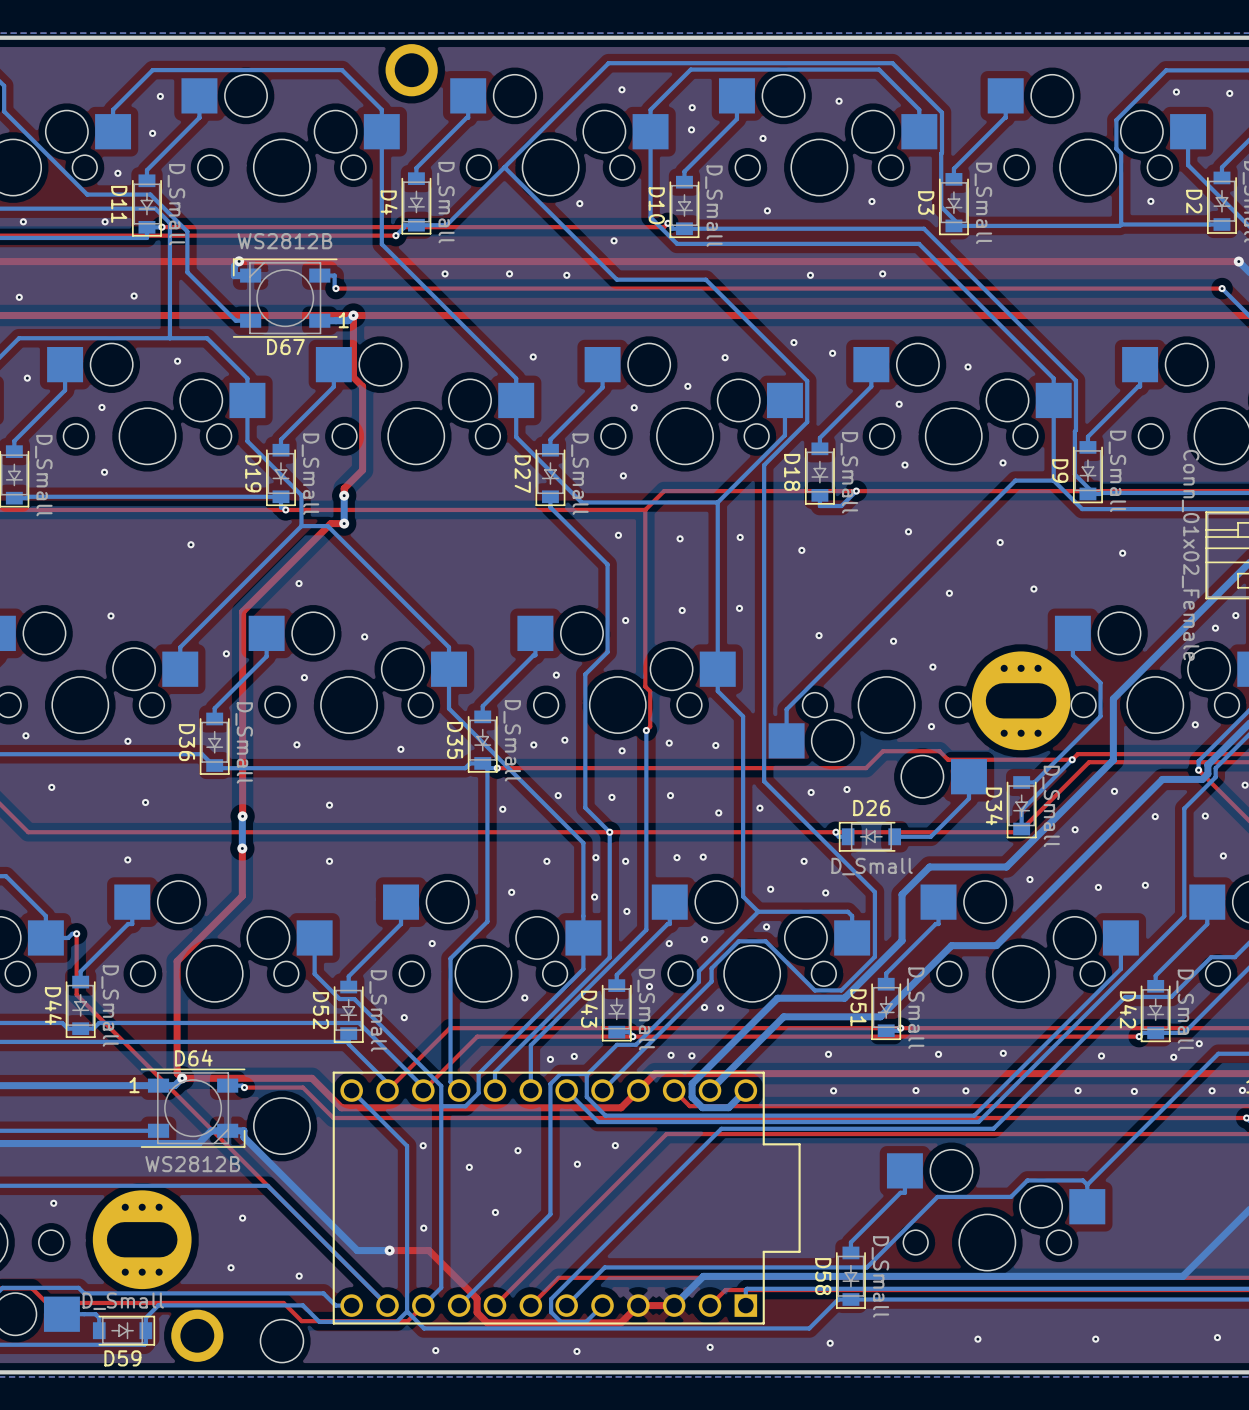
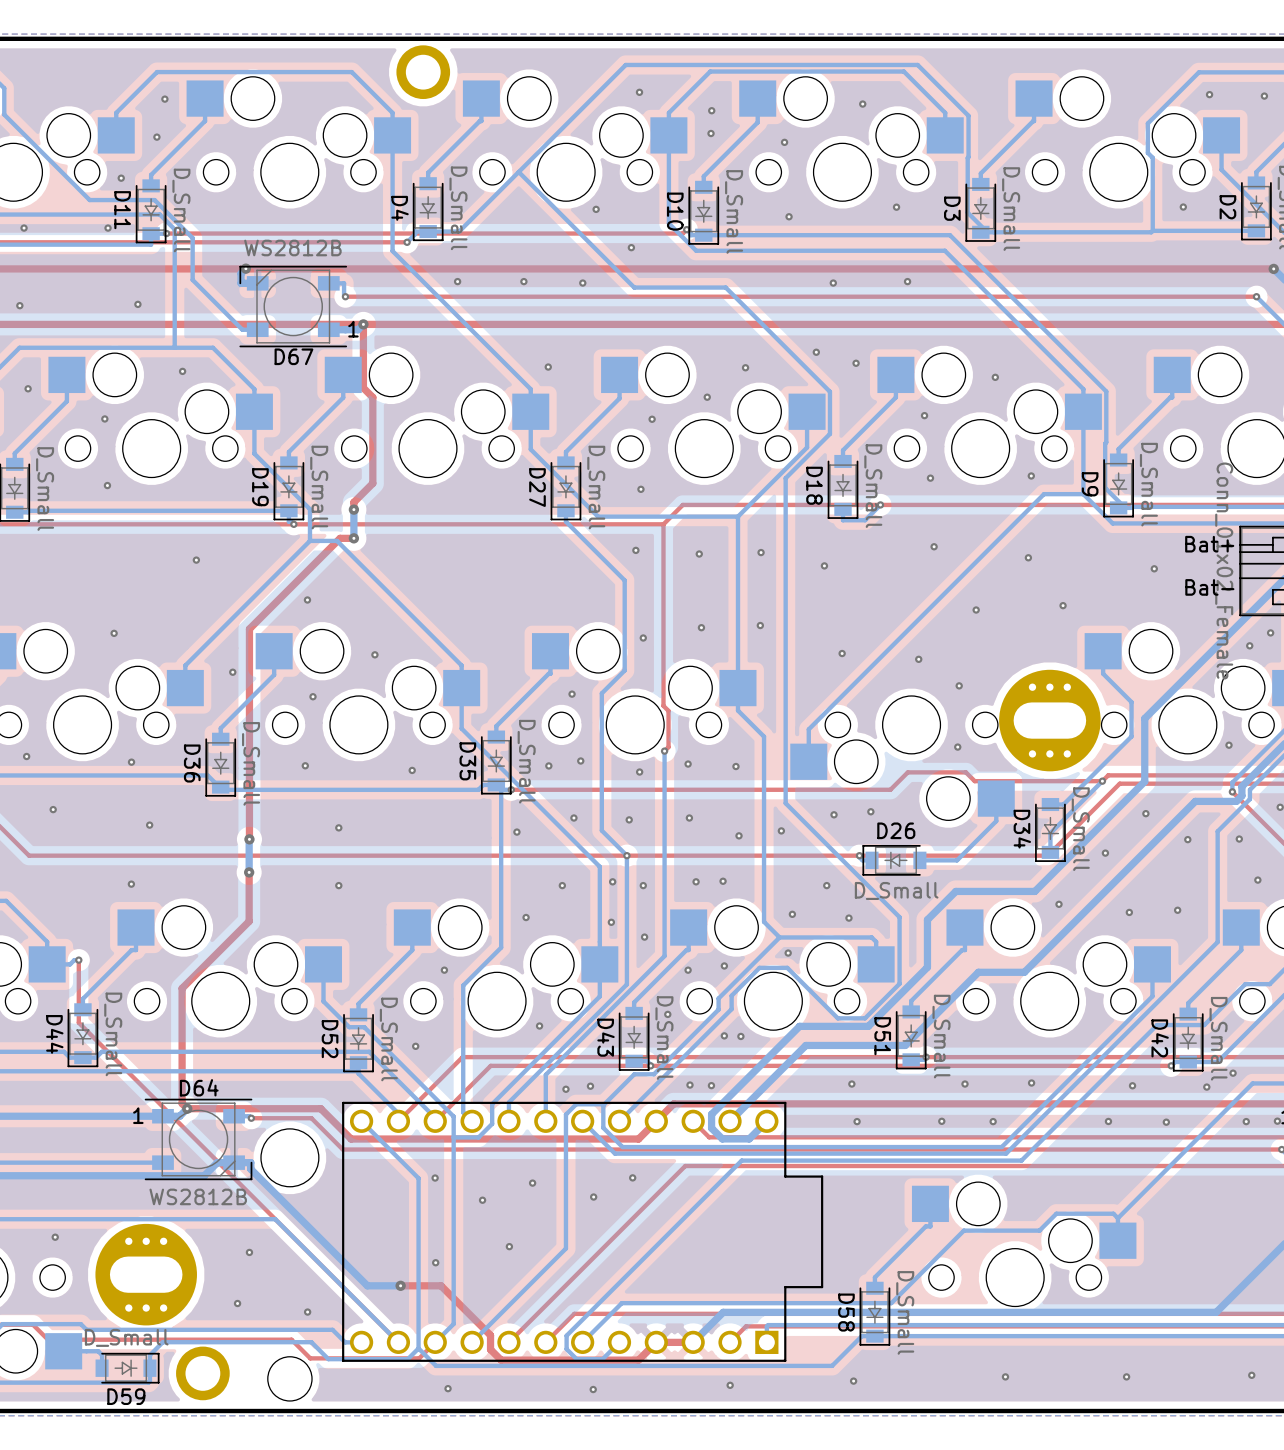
text: none -> Bat+ (1209, 544)
text: none -> Bat- (1209, 587)

